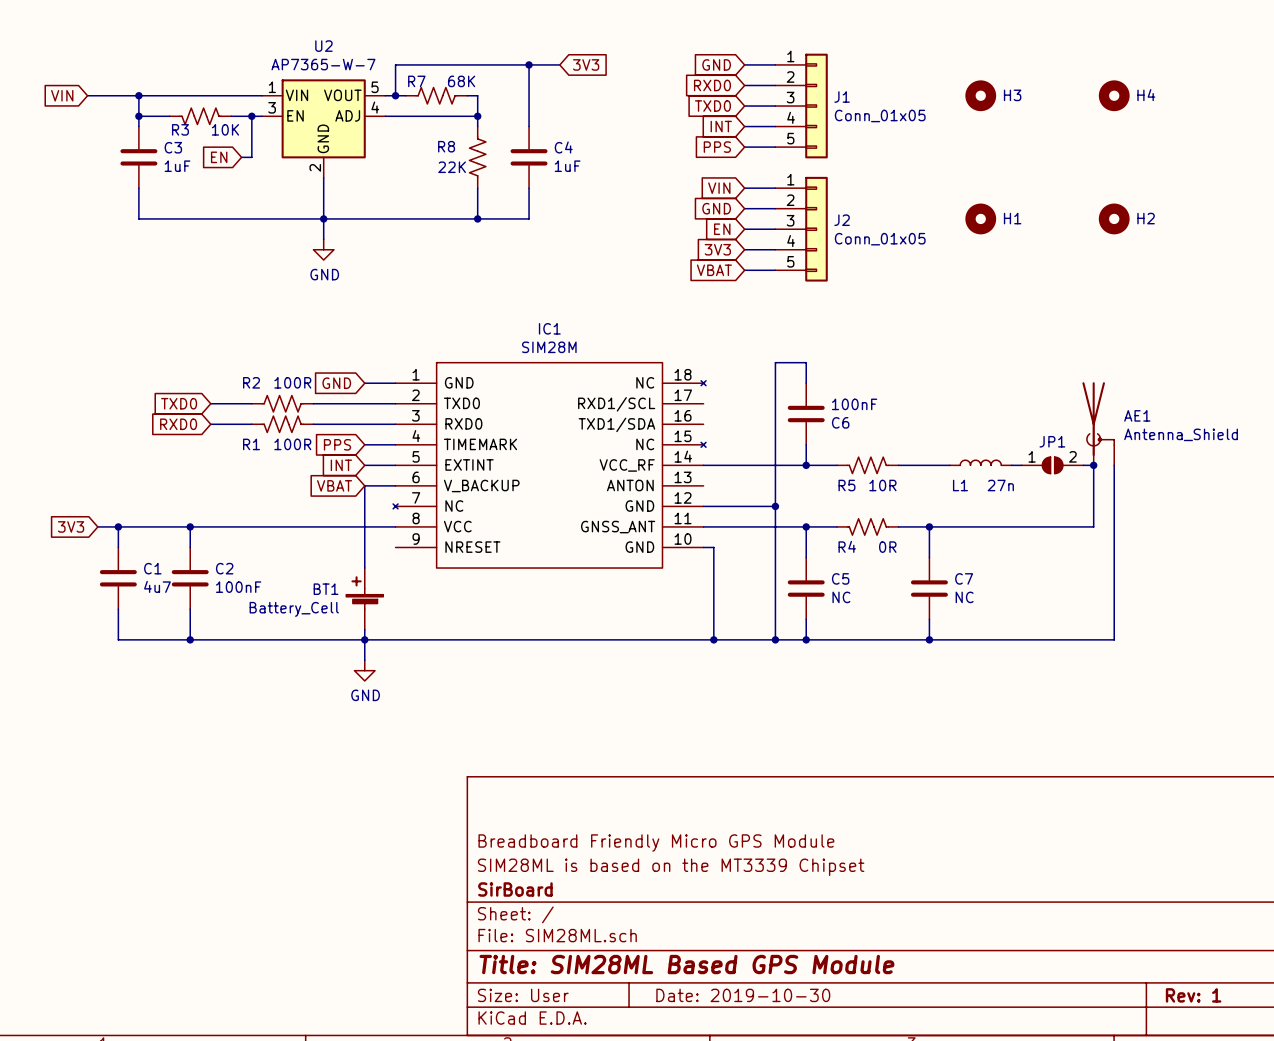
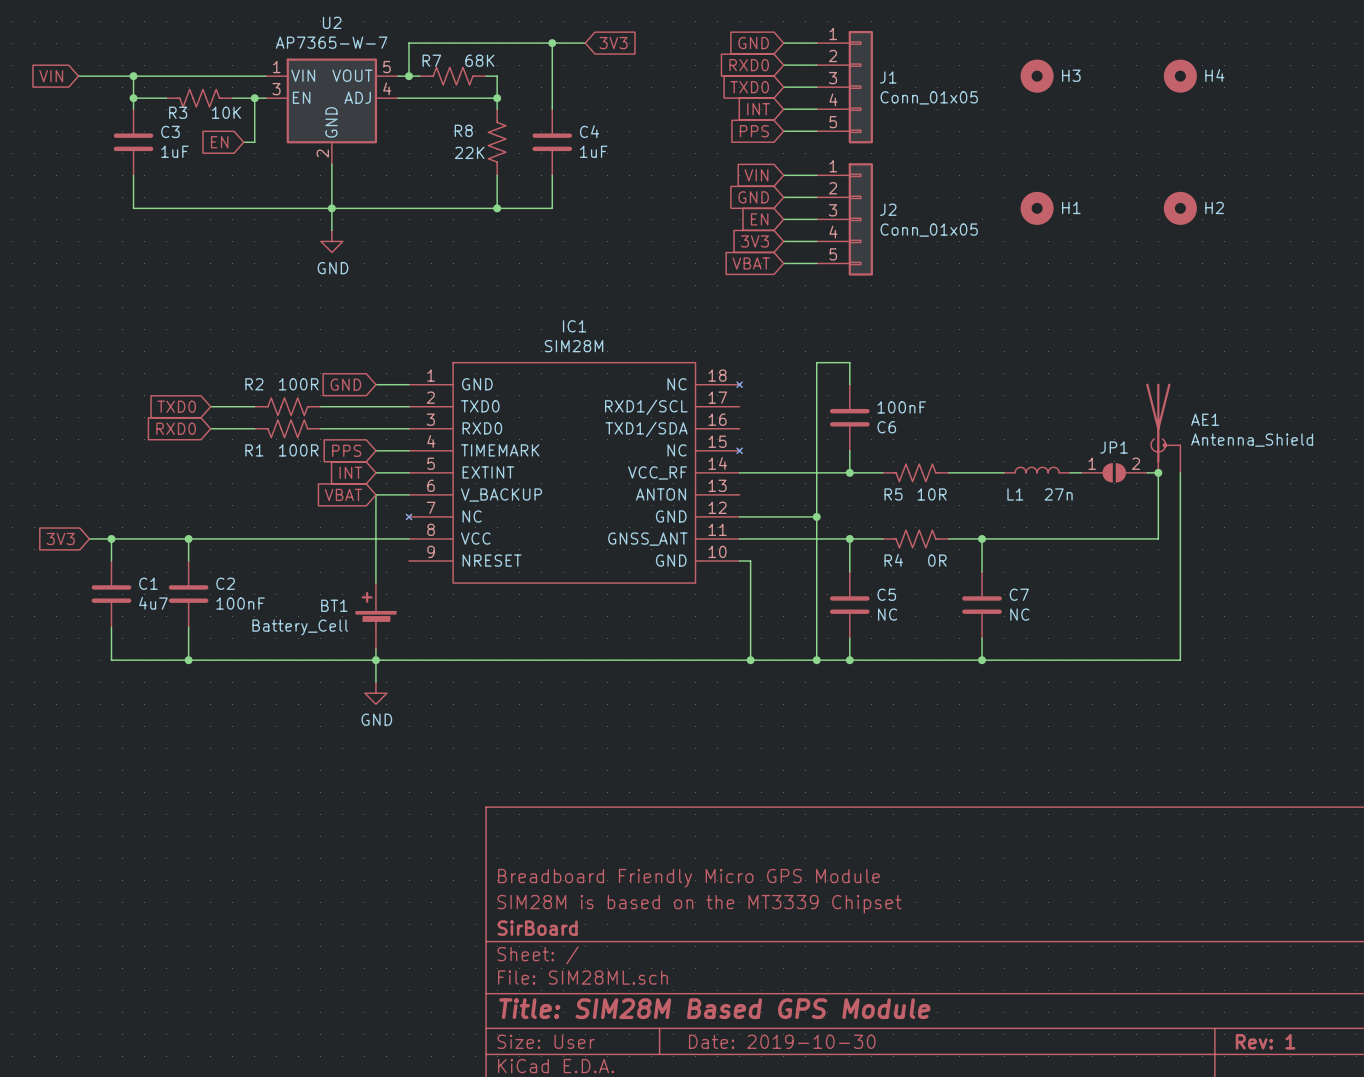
title block: SIM28ML is based on the MT3339 Chipset (671, 867) -> SIM28M is based on the MT3339 Chipset (699, 904)
title block: Title: SIM28ML Based GPS Module (686, 964) -> Title: SIM28M Based GPS Module (714, 1008)

